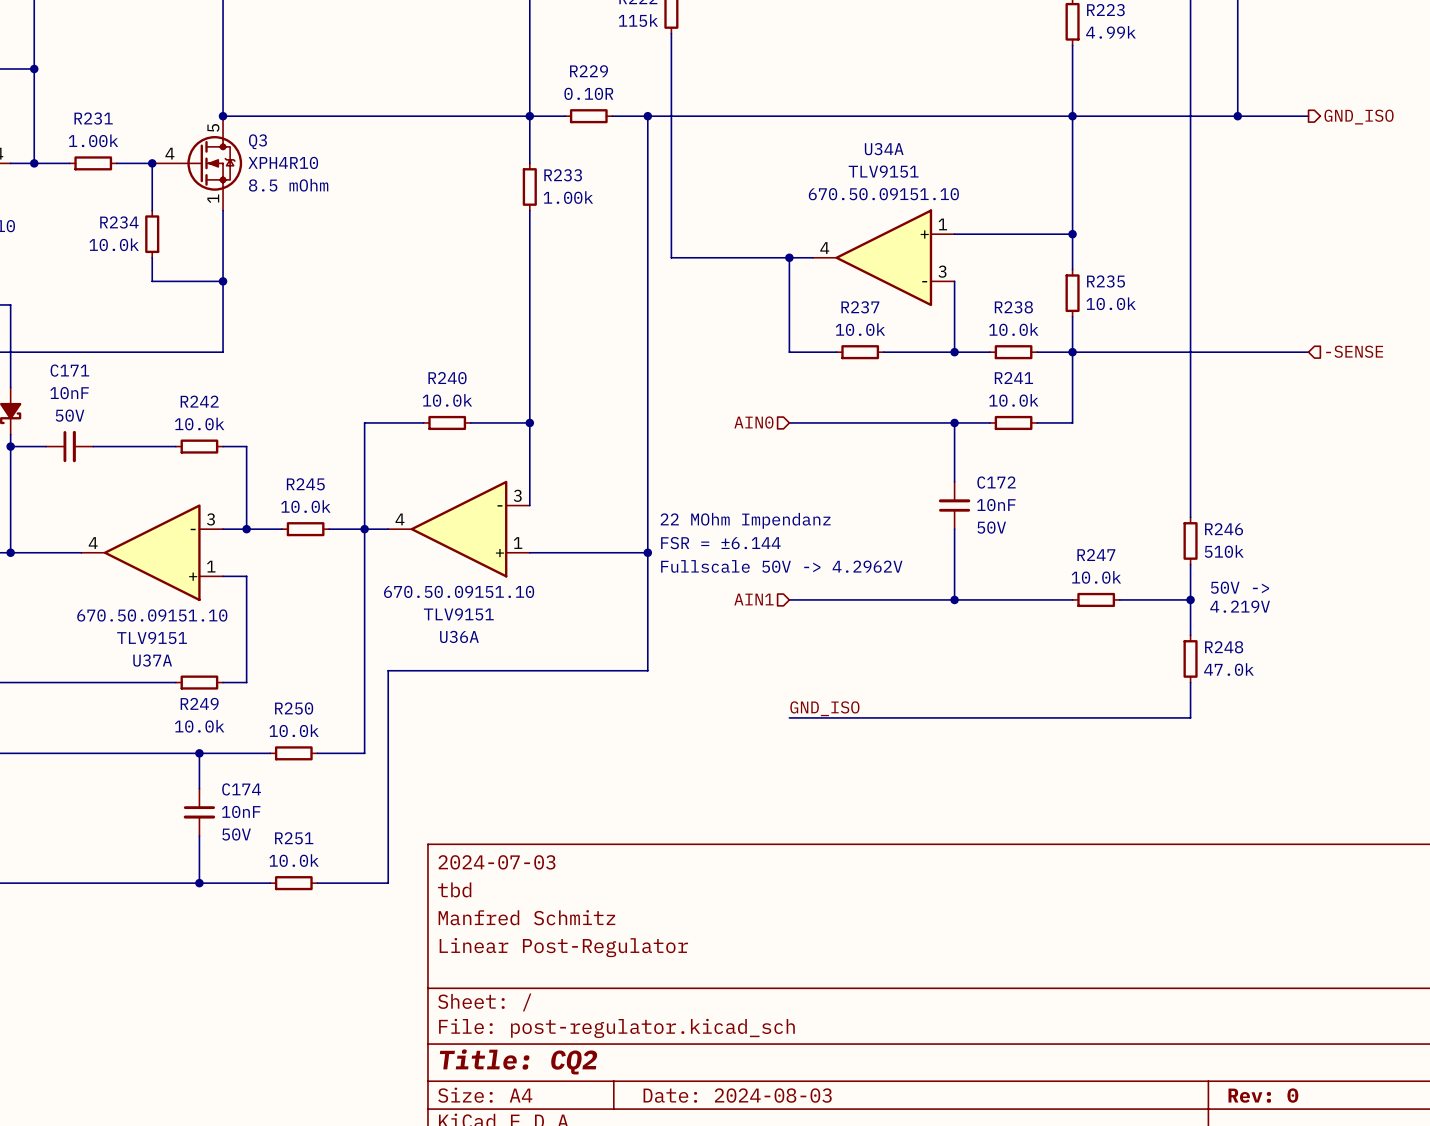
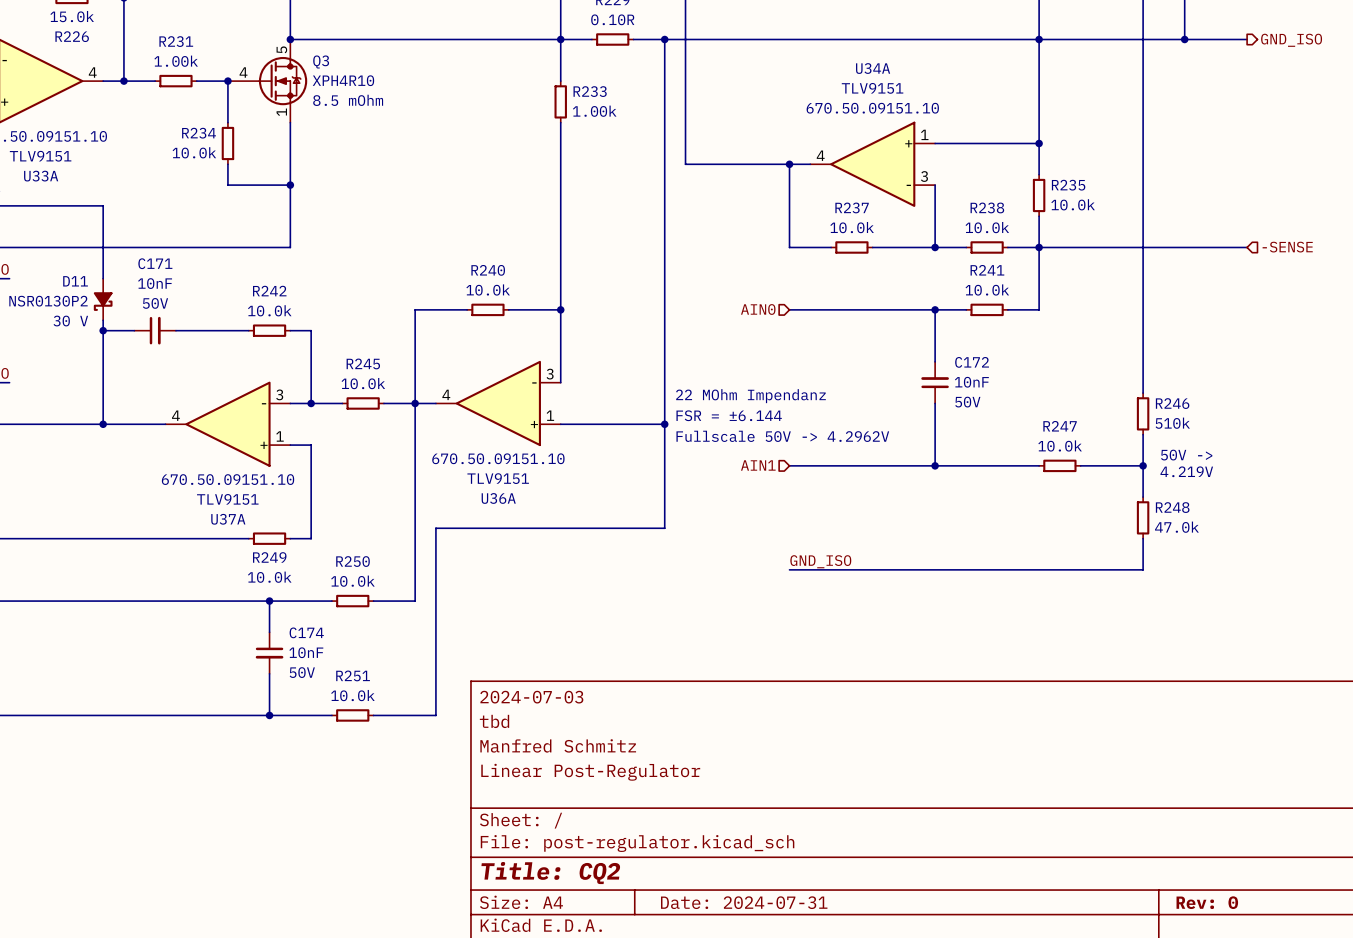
title block: Date: 2024-08-03 (737, 1095) -> Date: 2024-07-31 (744, 902)

